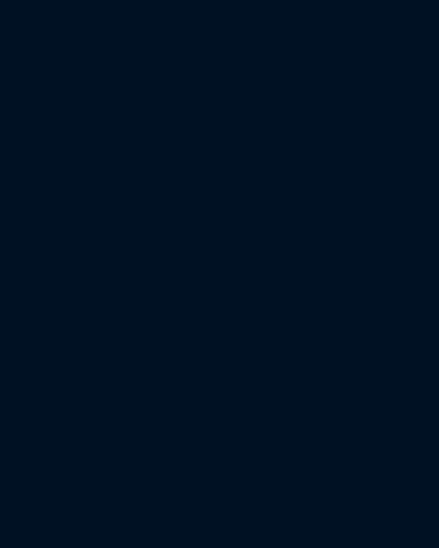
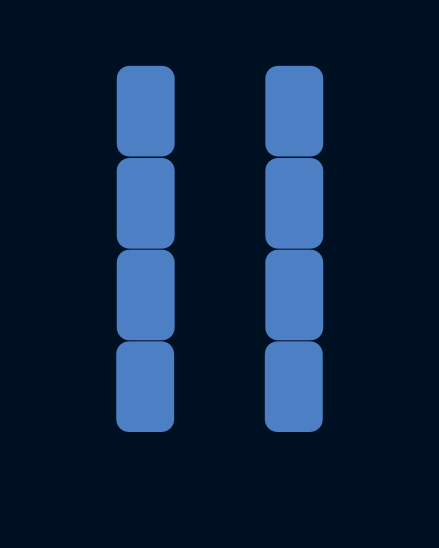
part: none -> (219, 111)
part: none -> (219, 203)
part: none -> (219, 295)
part: none -> (219, 386)

